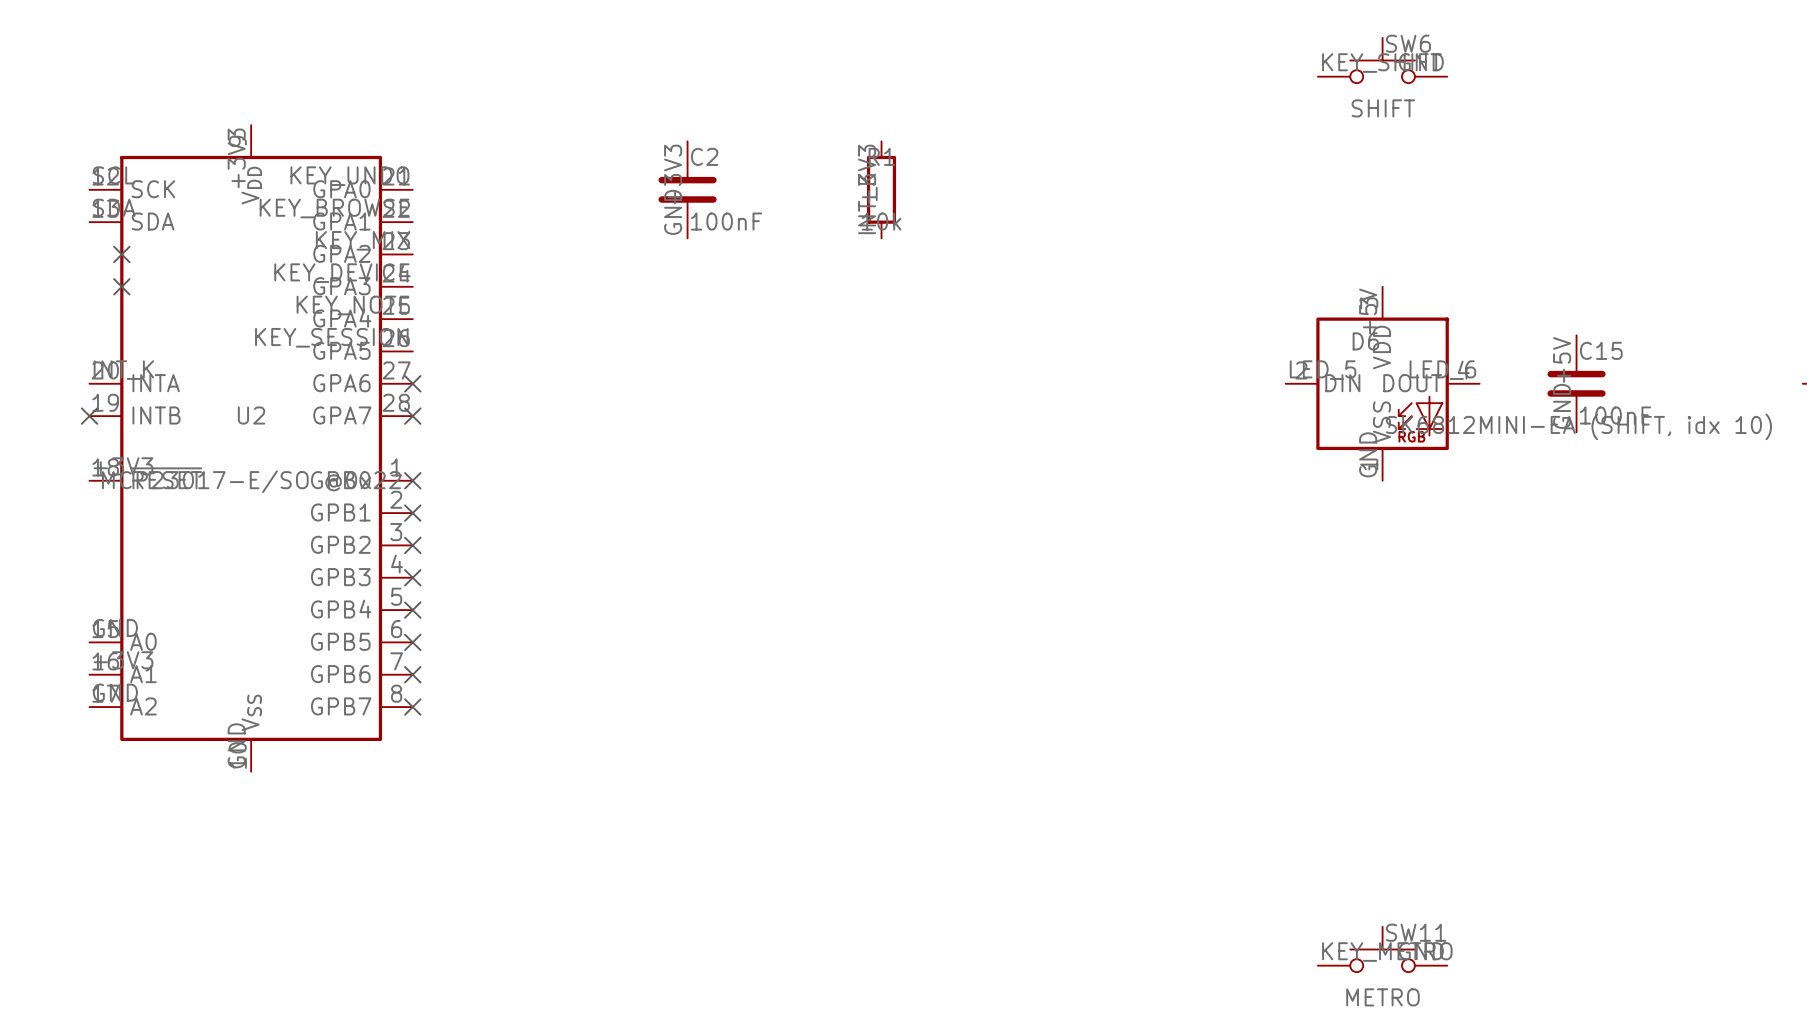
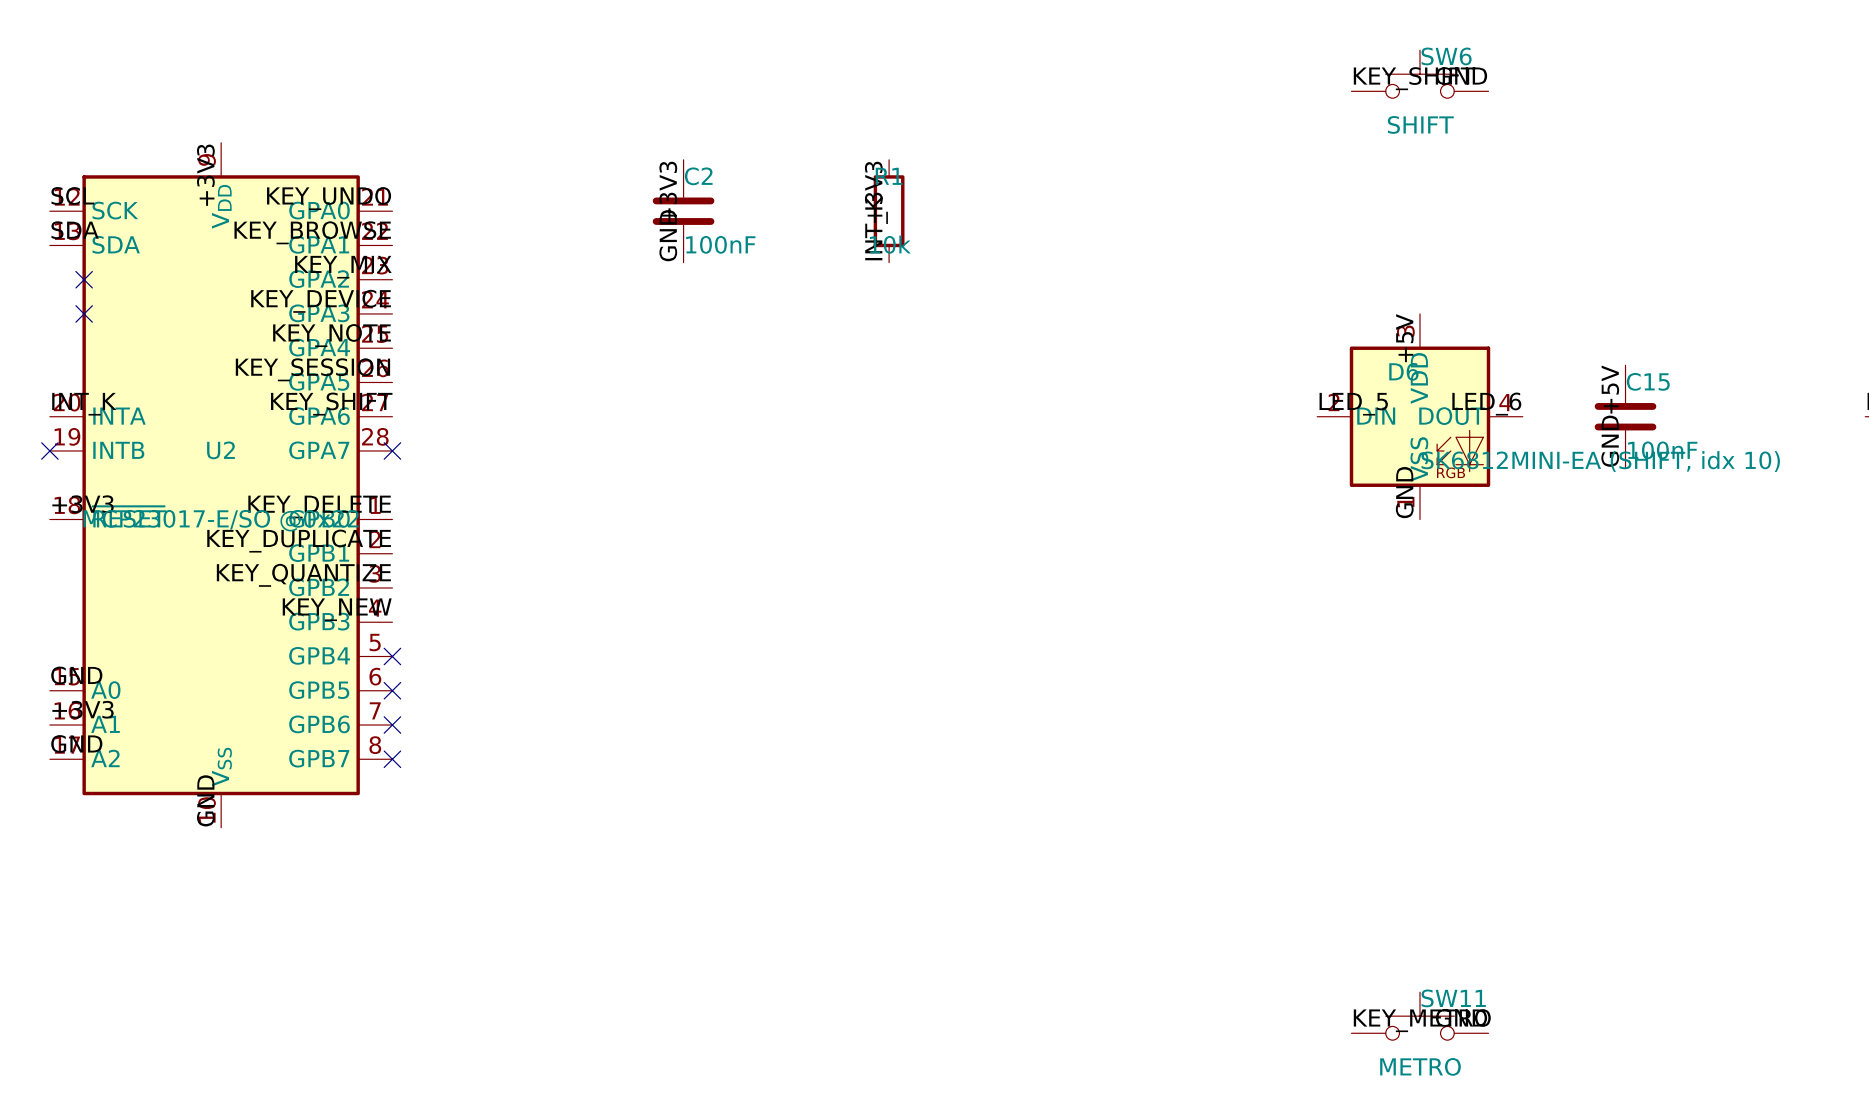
label: none -> KEY_SHIFT (331, 404)
no-connect mark: (412, 383) -> none
label: none -> KEY_DELETE (319, 506)
no-connect mark: (412, 480) -> none
label: none -> KEY_DUPLICATE (299, 541)
no-connect mark: (412, 513) -> none
label: none -> KEY_QUANTIZE (303, 575)
no-connect mark: (412, 545) -> none
label: none -> KEY_NEW (337, 609)
no-connect mark: (412, 577) -> none

